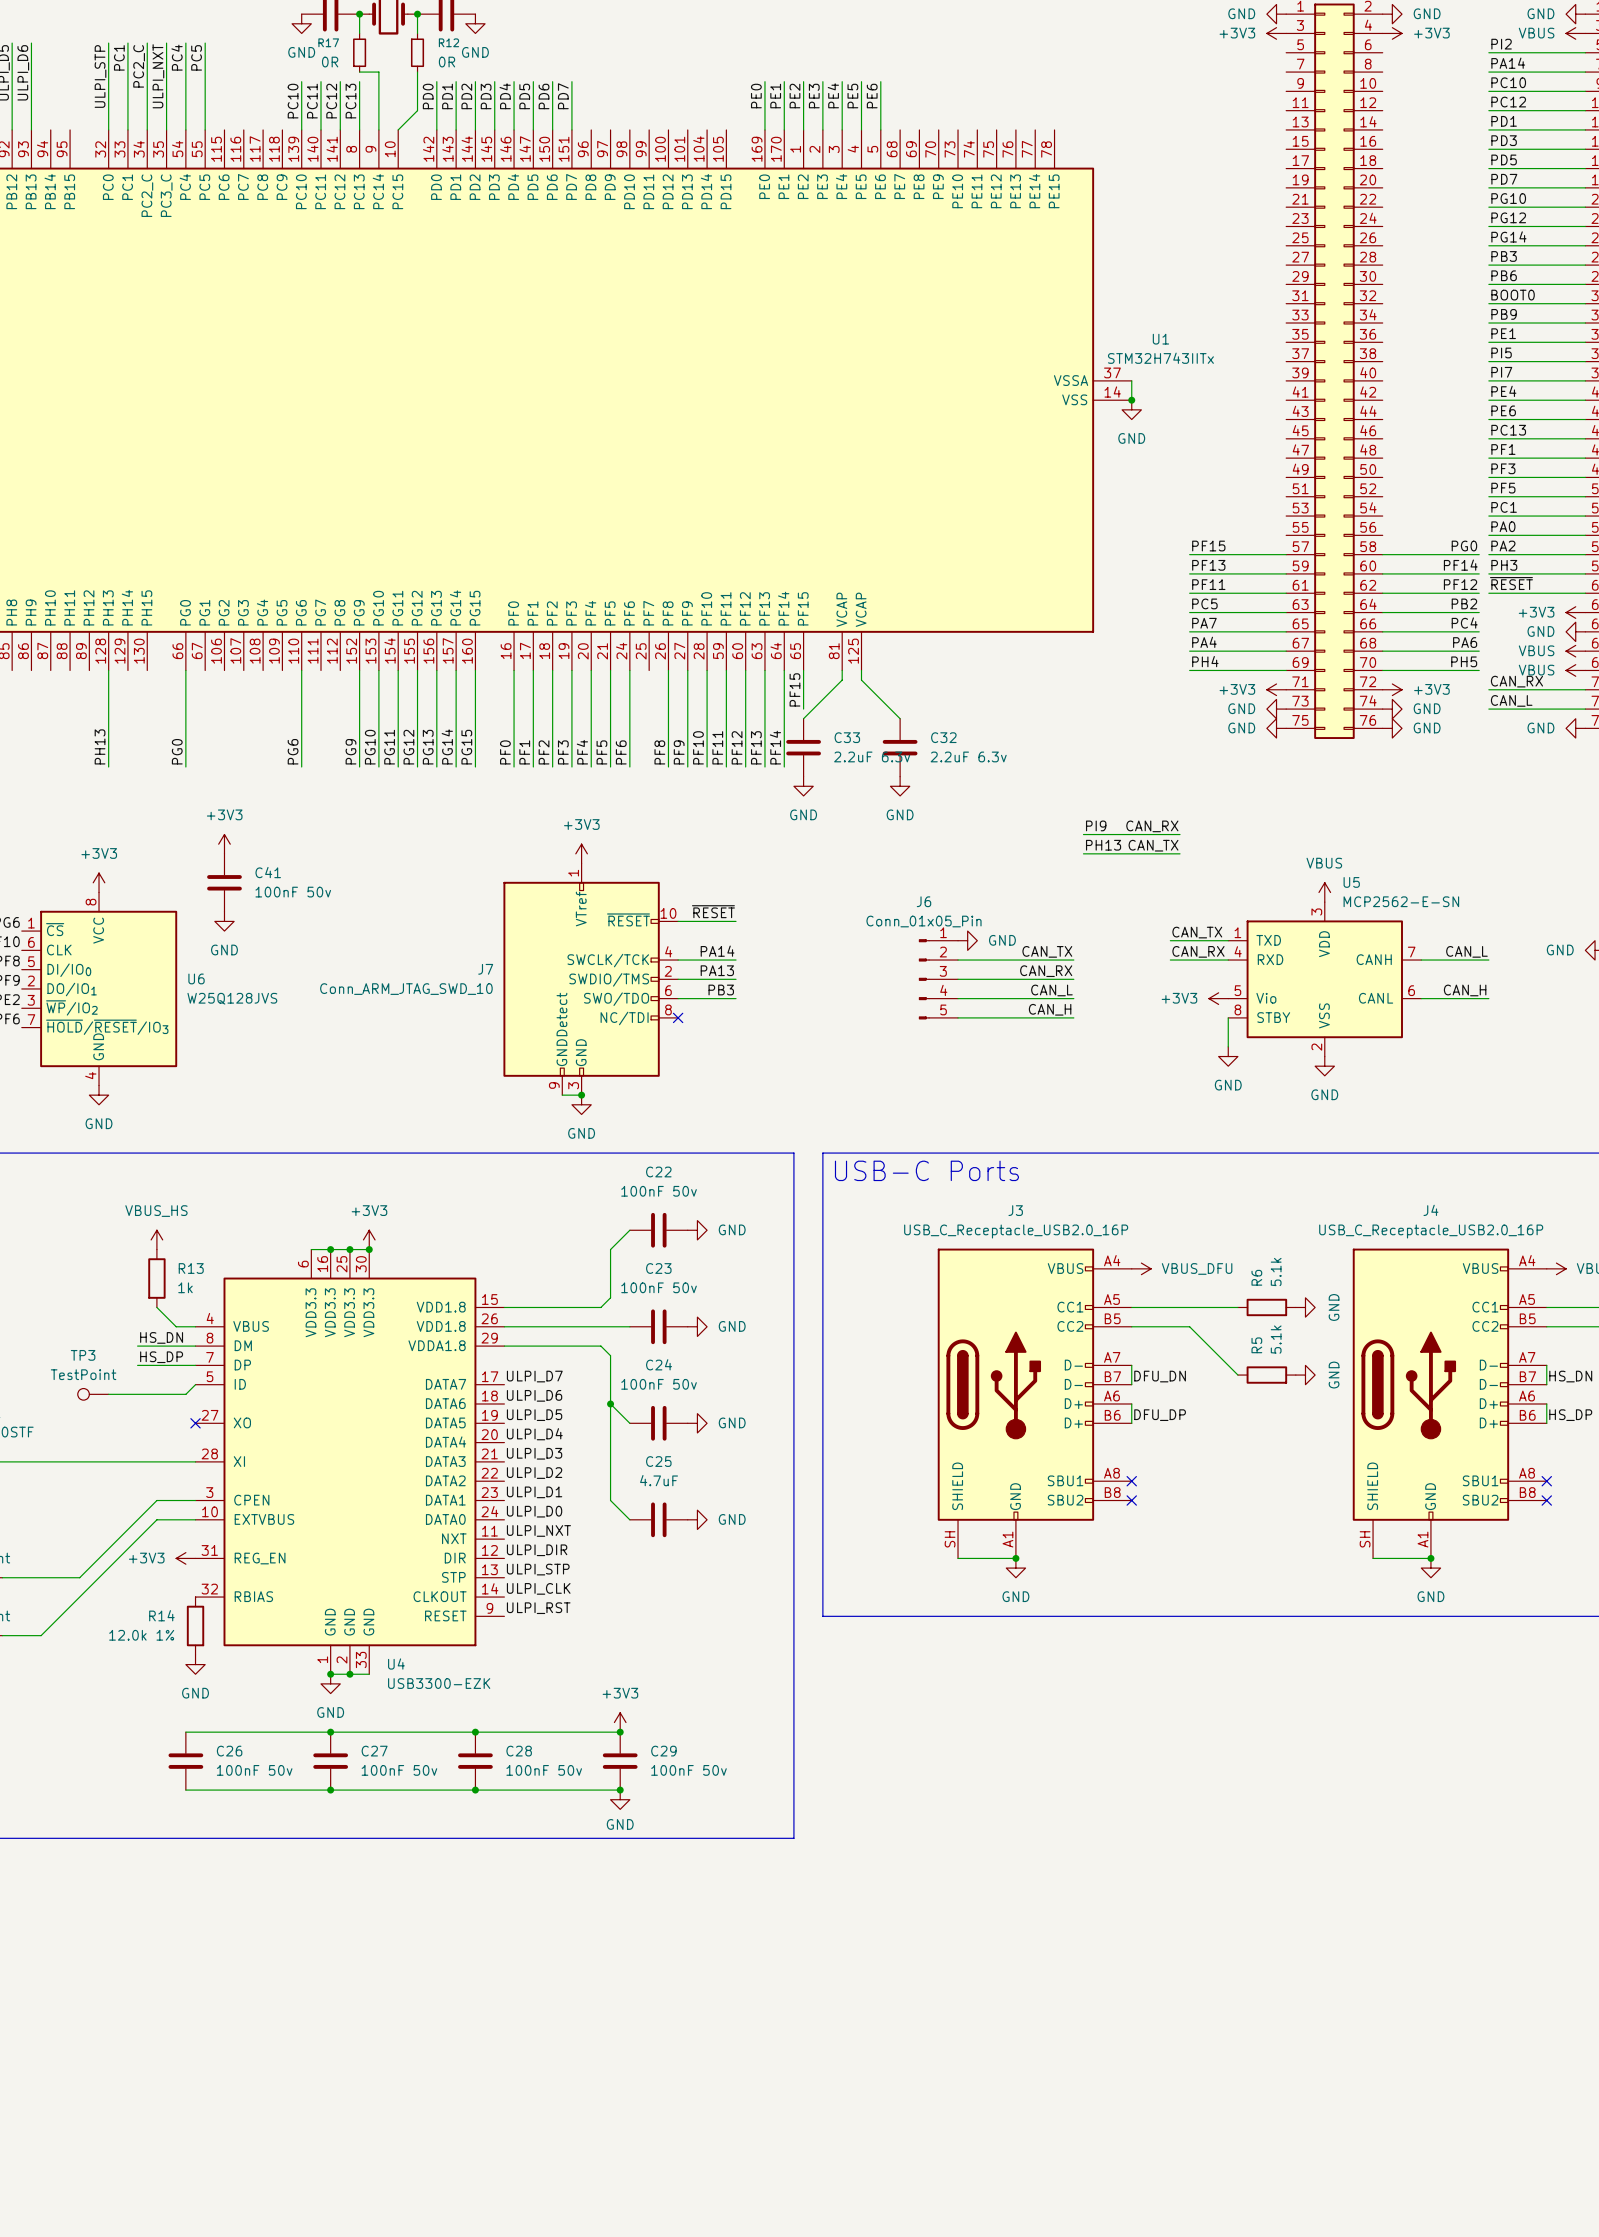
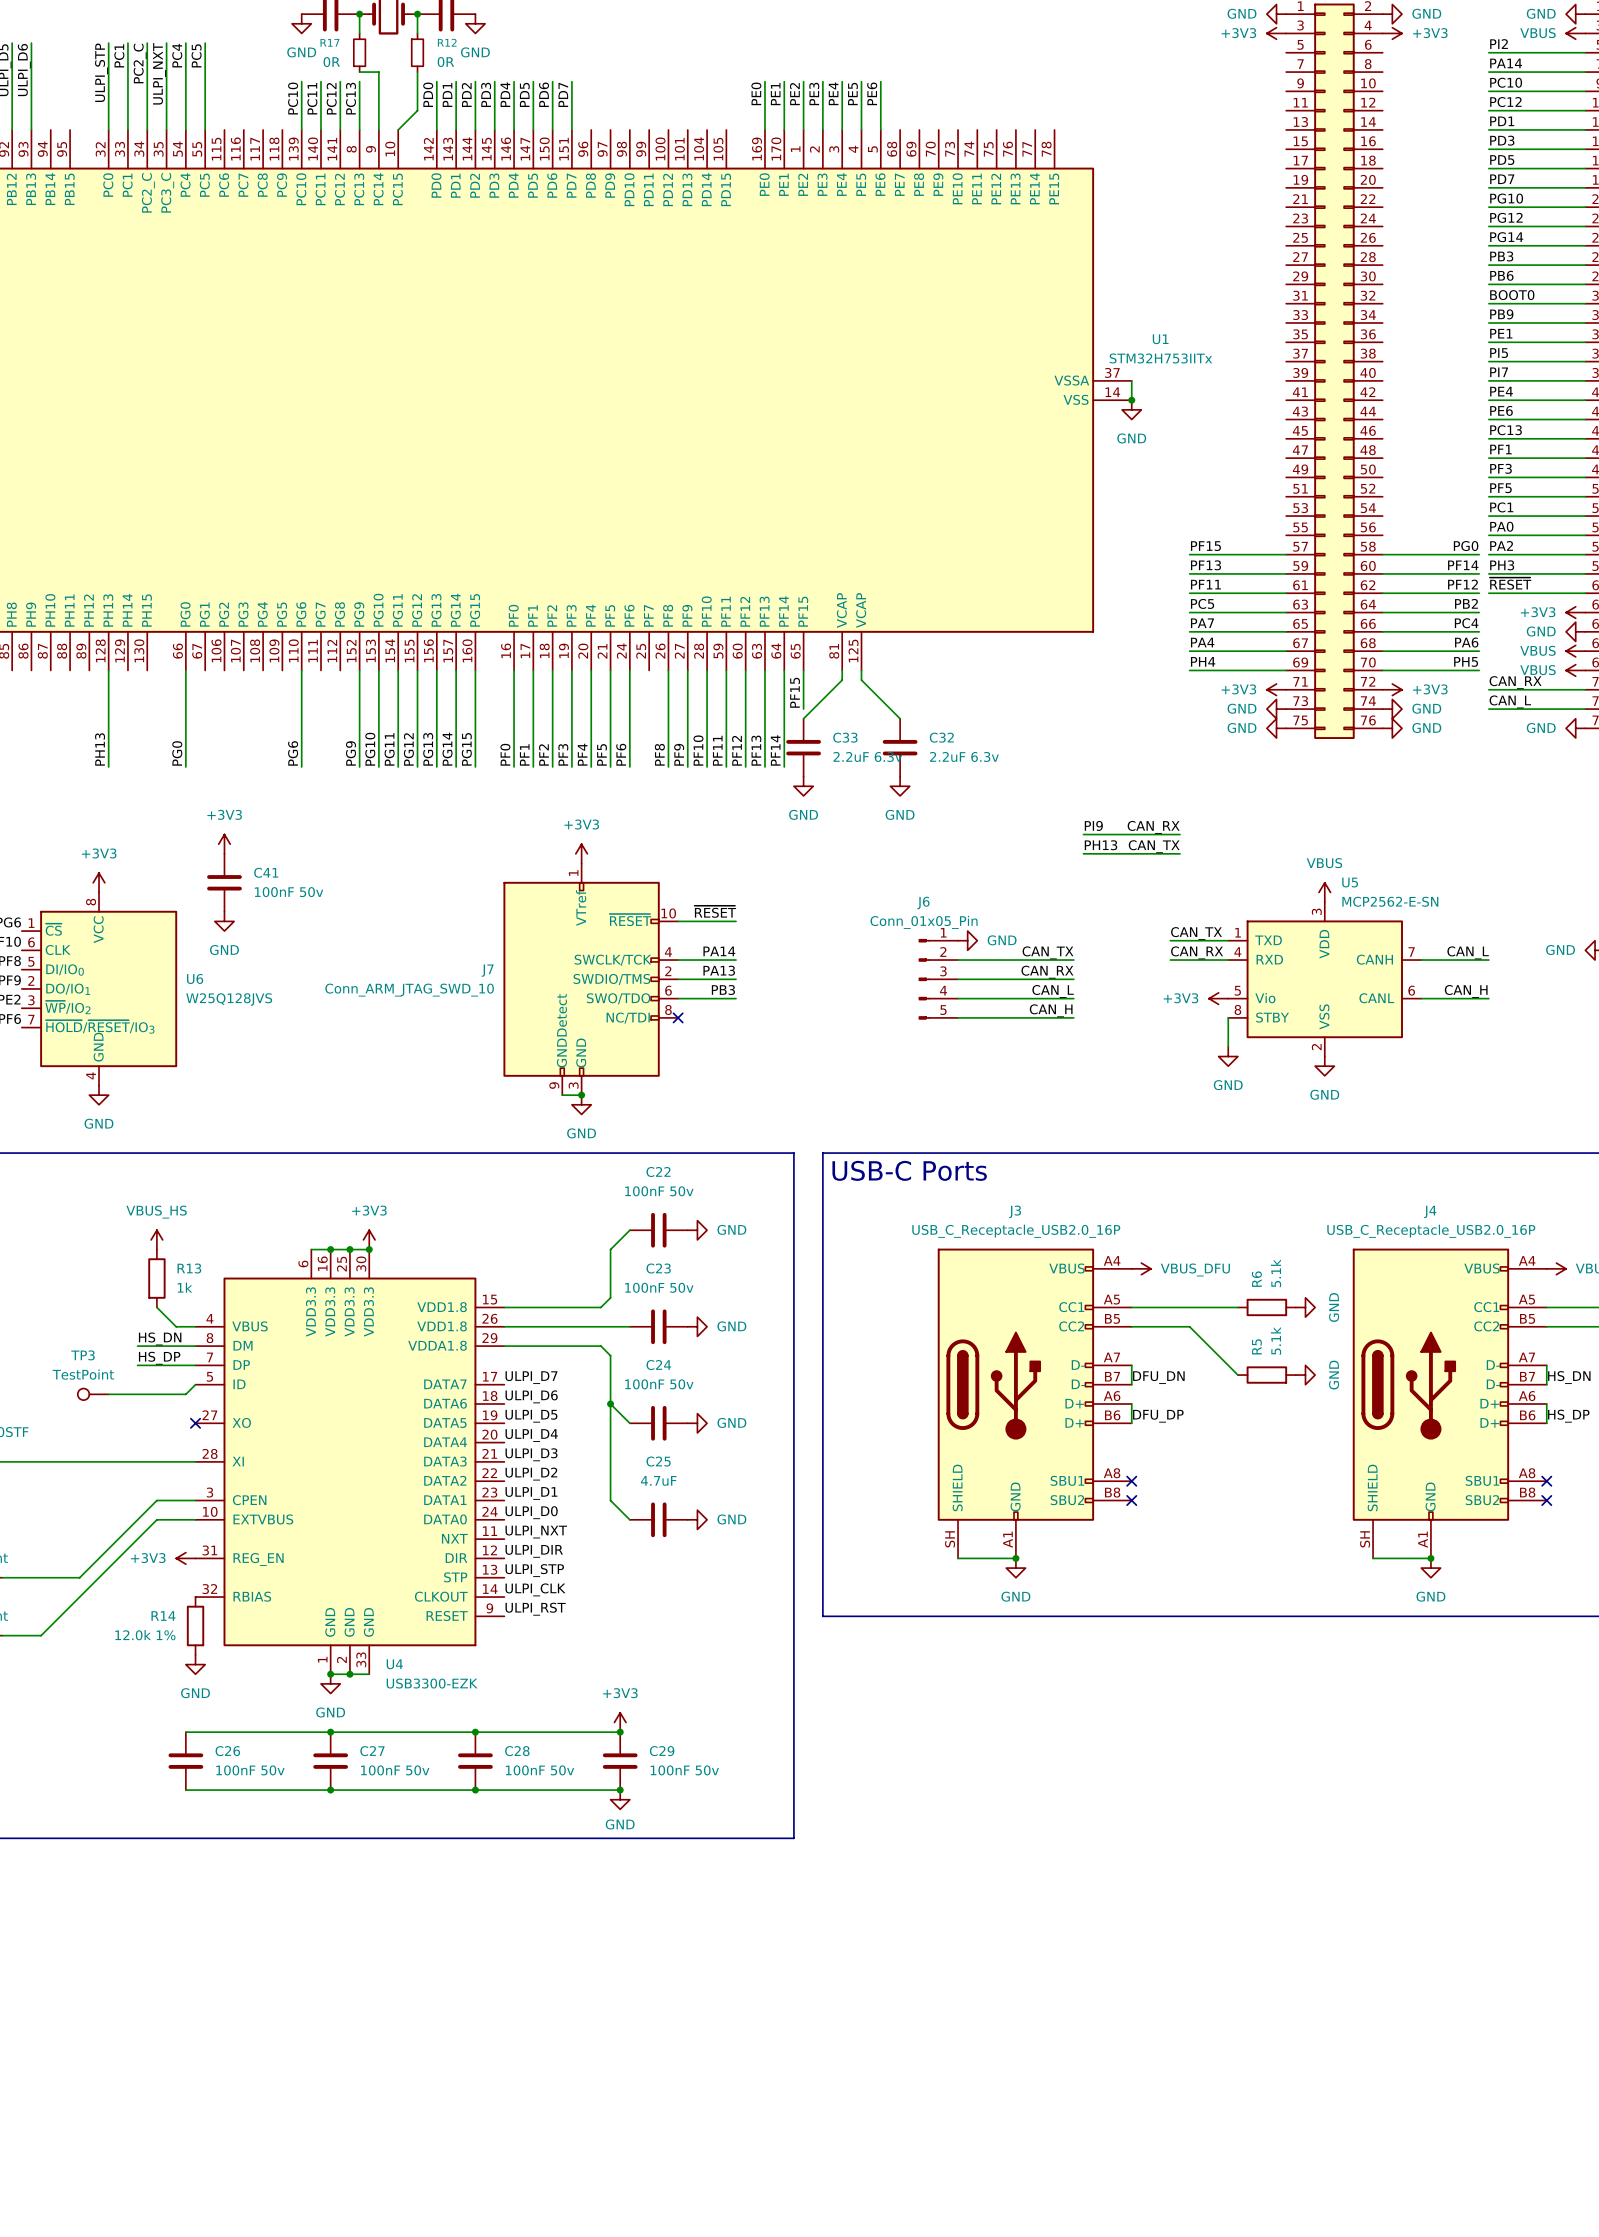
U1 value: STM32H743IITx (1160, 358) -> STM32H753IITx (1160, 358)

